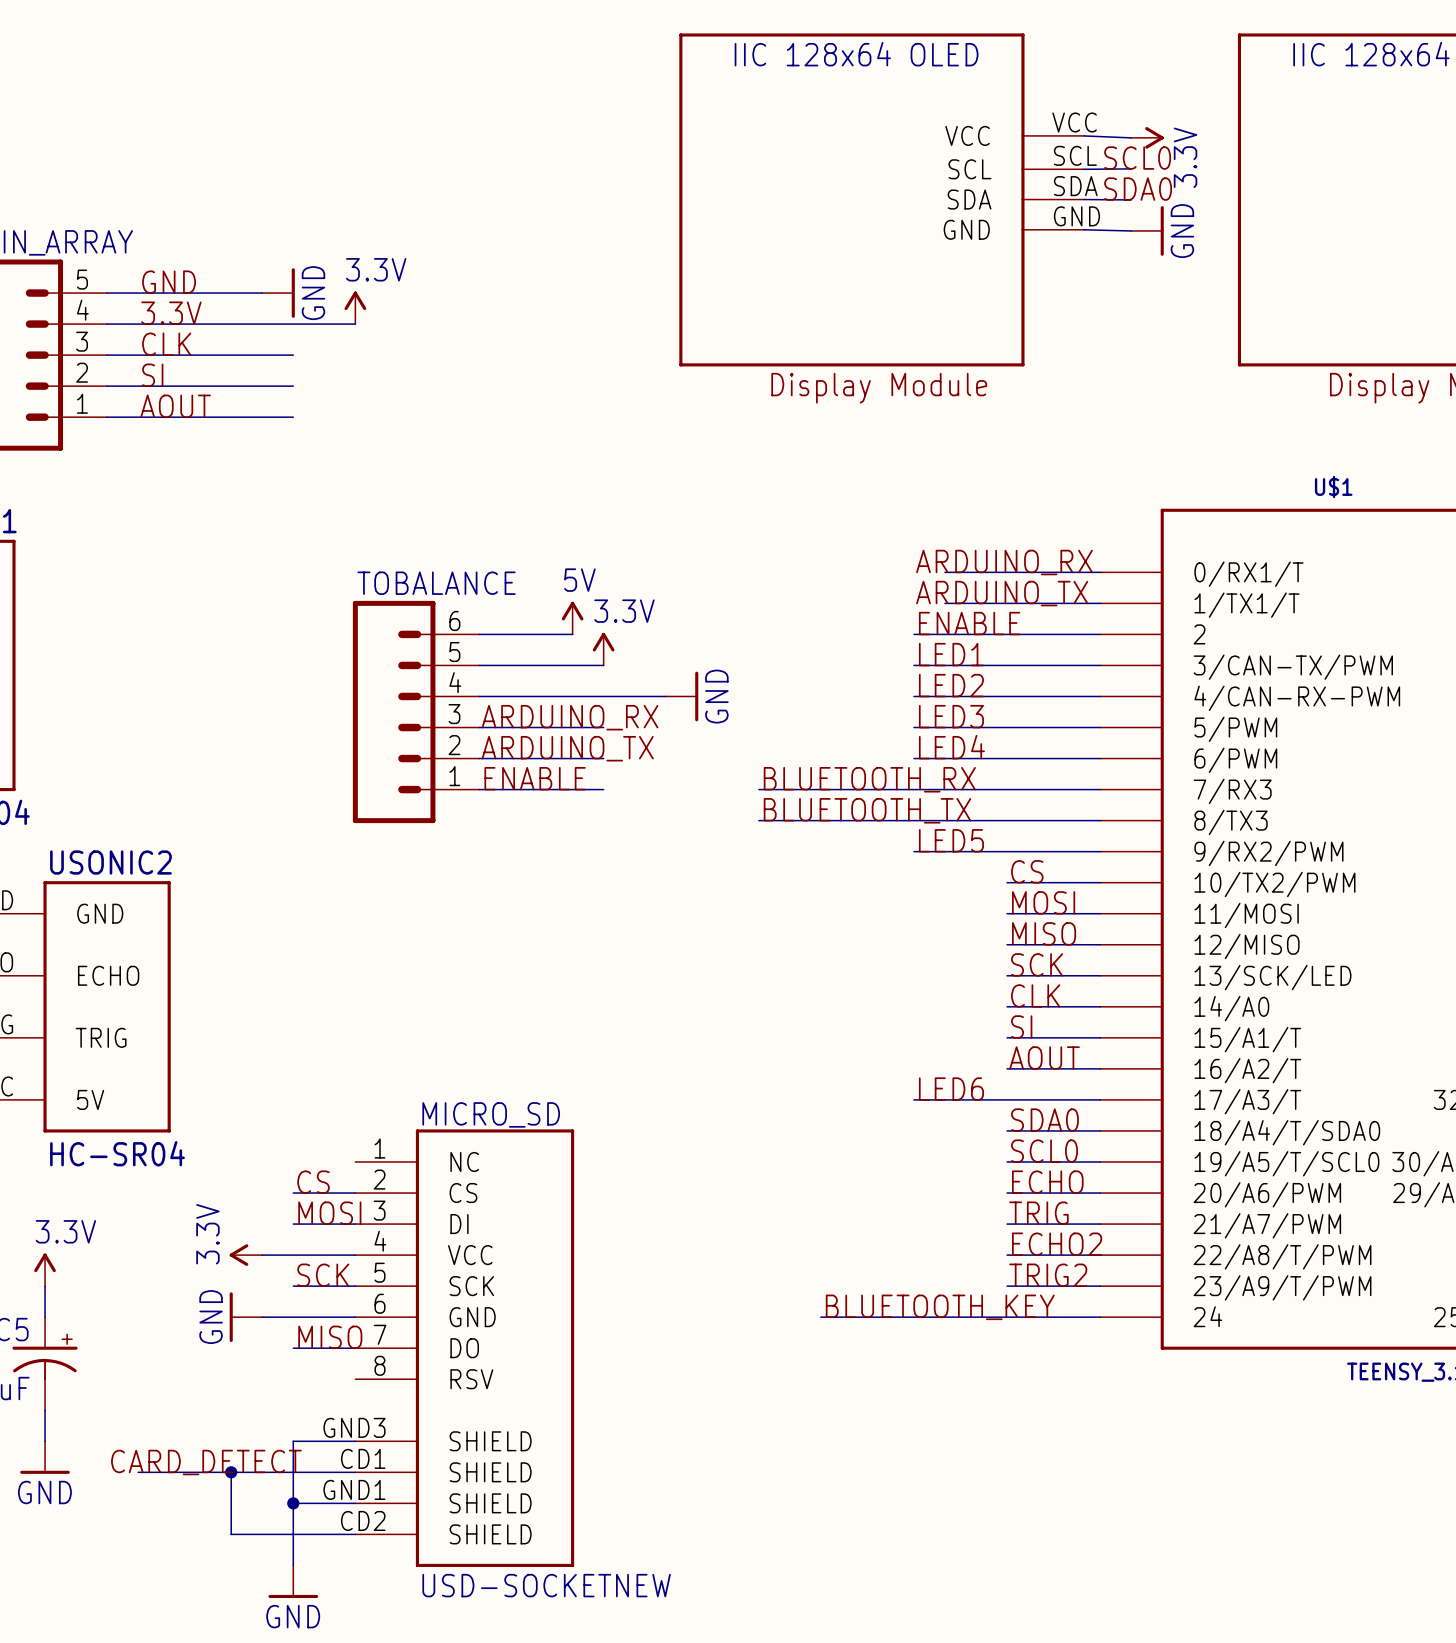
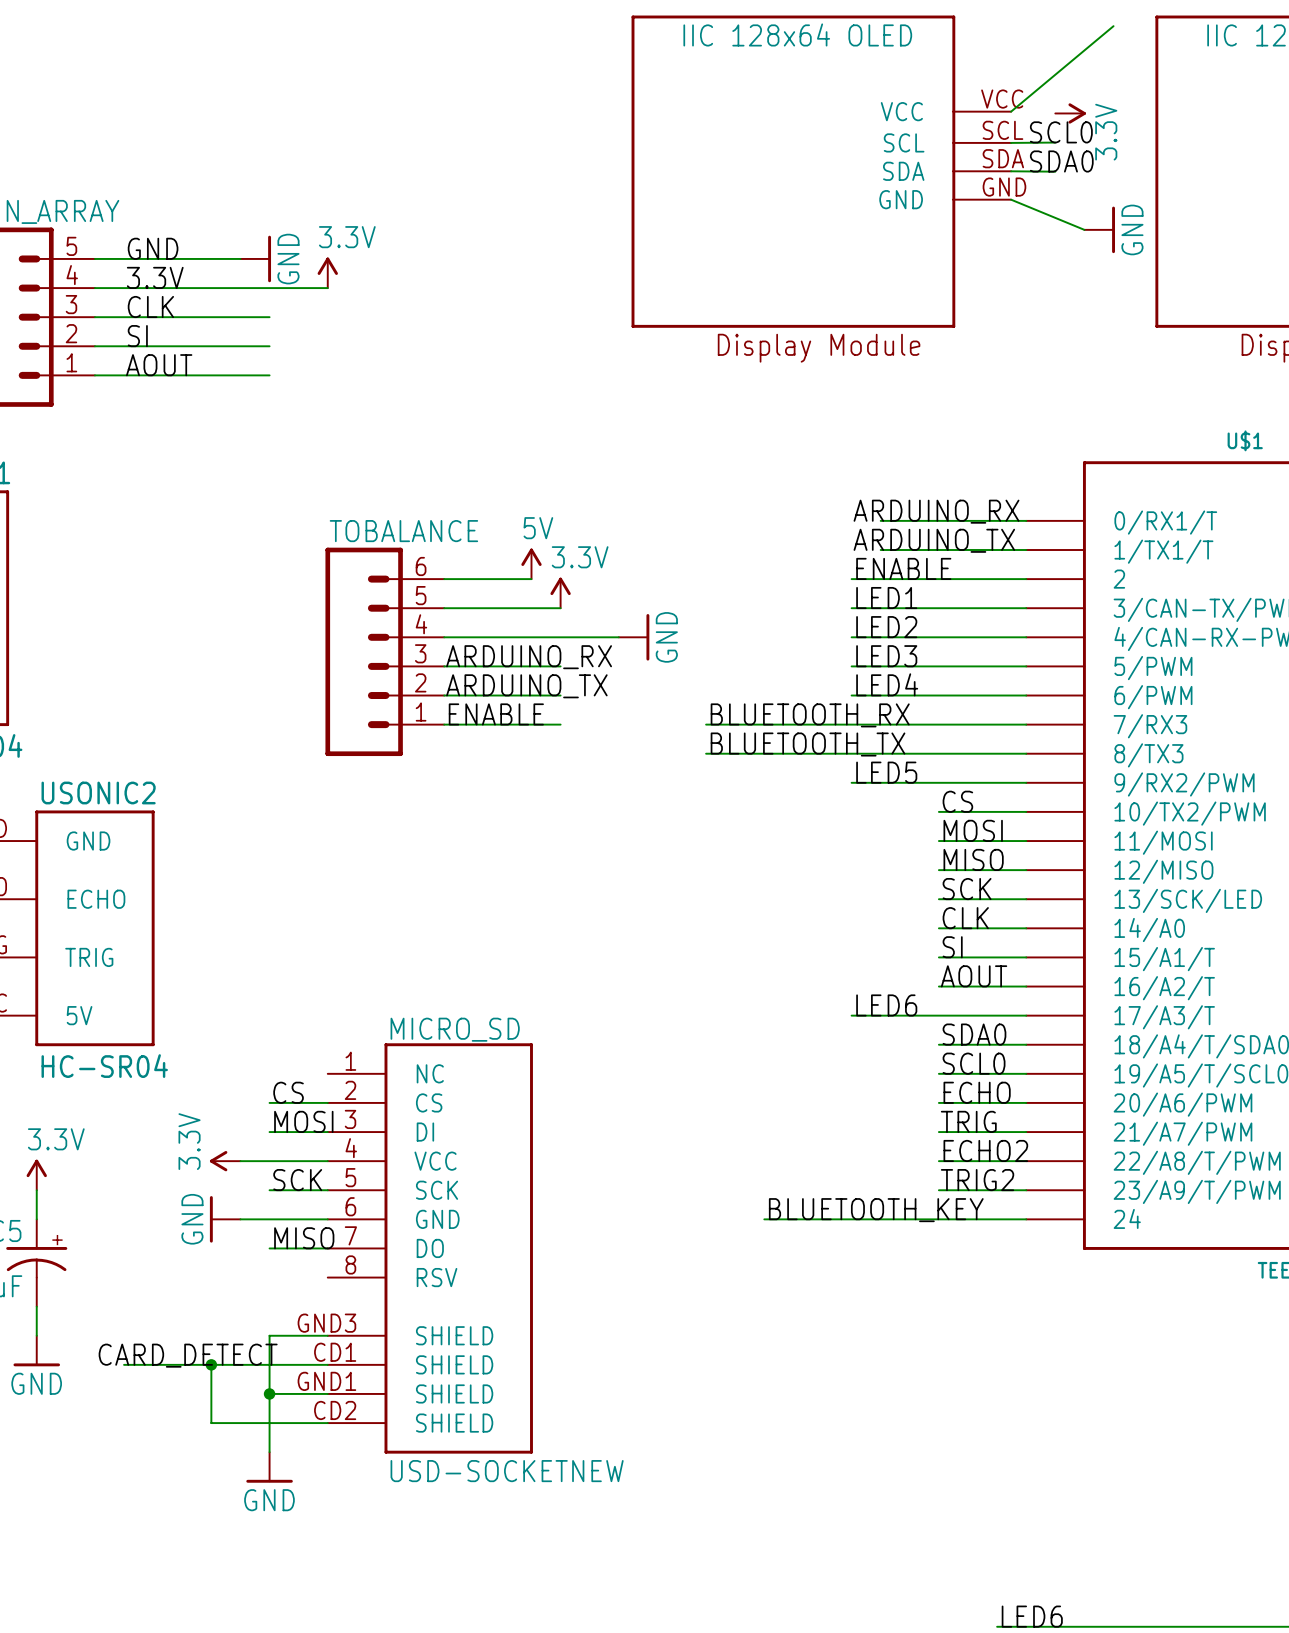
wire: (1084, 135) (1131, 137) -> (1011, 111) (1113, 26)
wire: (1084, 229) (1131, 230) -> (1011, 199) (1084, 229)
power symbol position: GND (1147, 230) -> GND (1099, 229)

